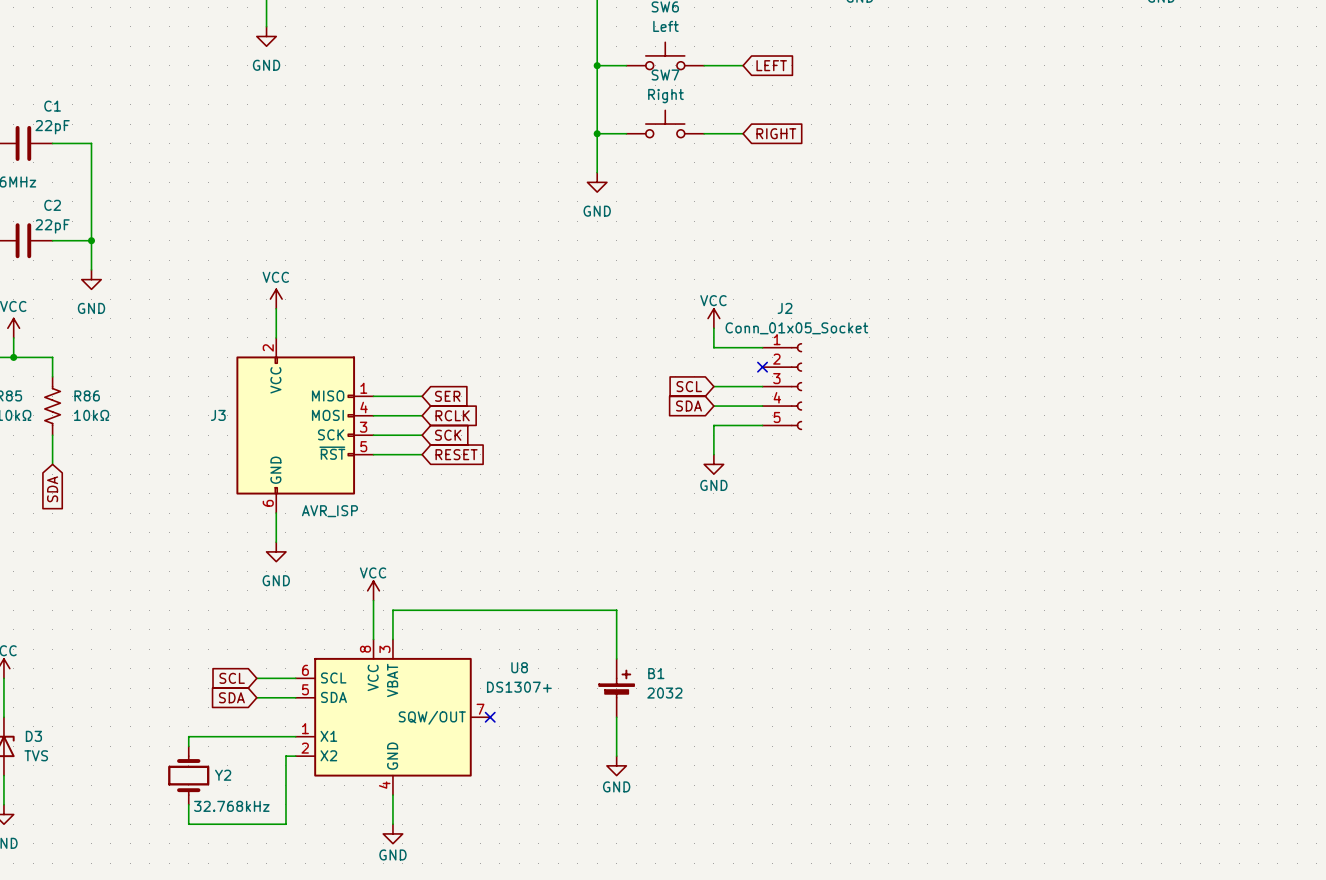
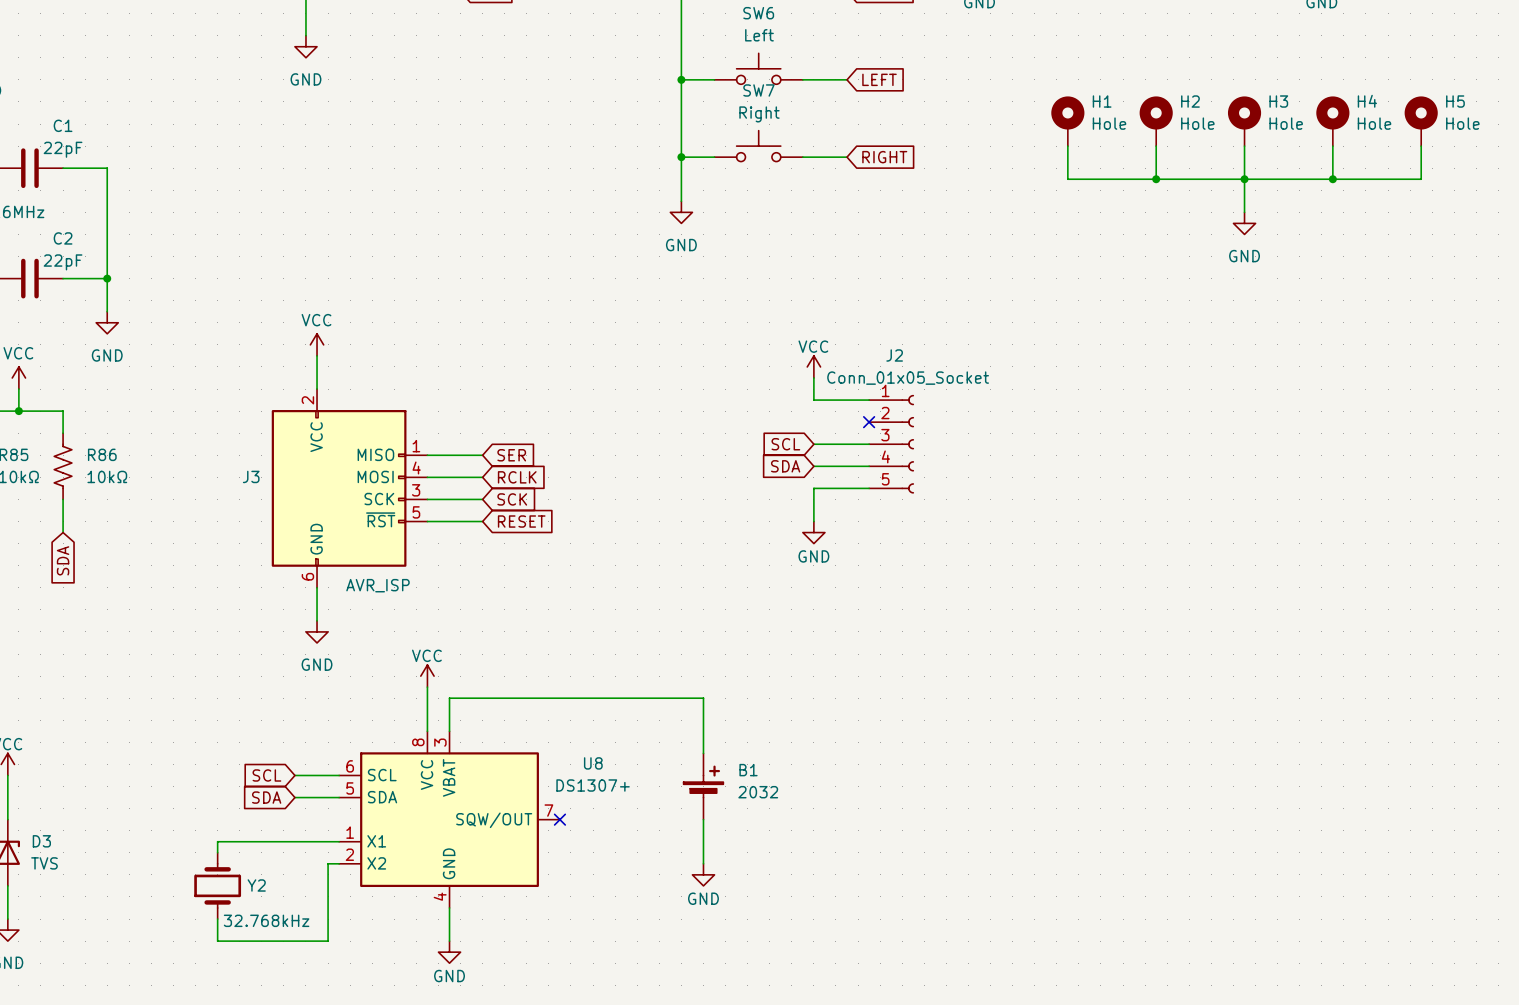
H1: none -> Hole (1067, 121)
H2: none -> Hole (1156, 121)
H3: none -> Hole (1244, 121)
H4: none -> Hole (1332, 121)
H5: none -> Hole (1421, 121)
wire: none -> (1067, 146) (1067, 179) (1421, 179) (1421, 146)
wire: none -> (1156, 146) (1156, 179)
wire: none -> (1244, 146) (1244, 212)
wire: none -> (1332, 146) (1332, 179)
junction: none -> (1156, 179)
junction: none -> (1244, 179)
junction: none -> (1332, 179)
power symbol: none -> GND (1244, 223)

